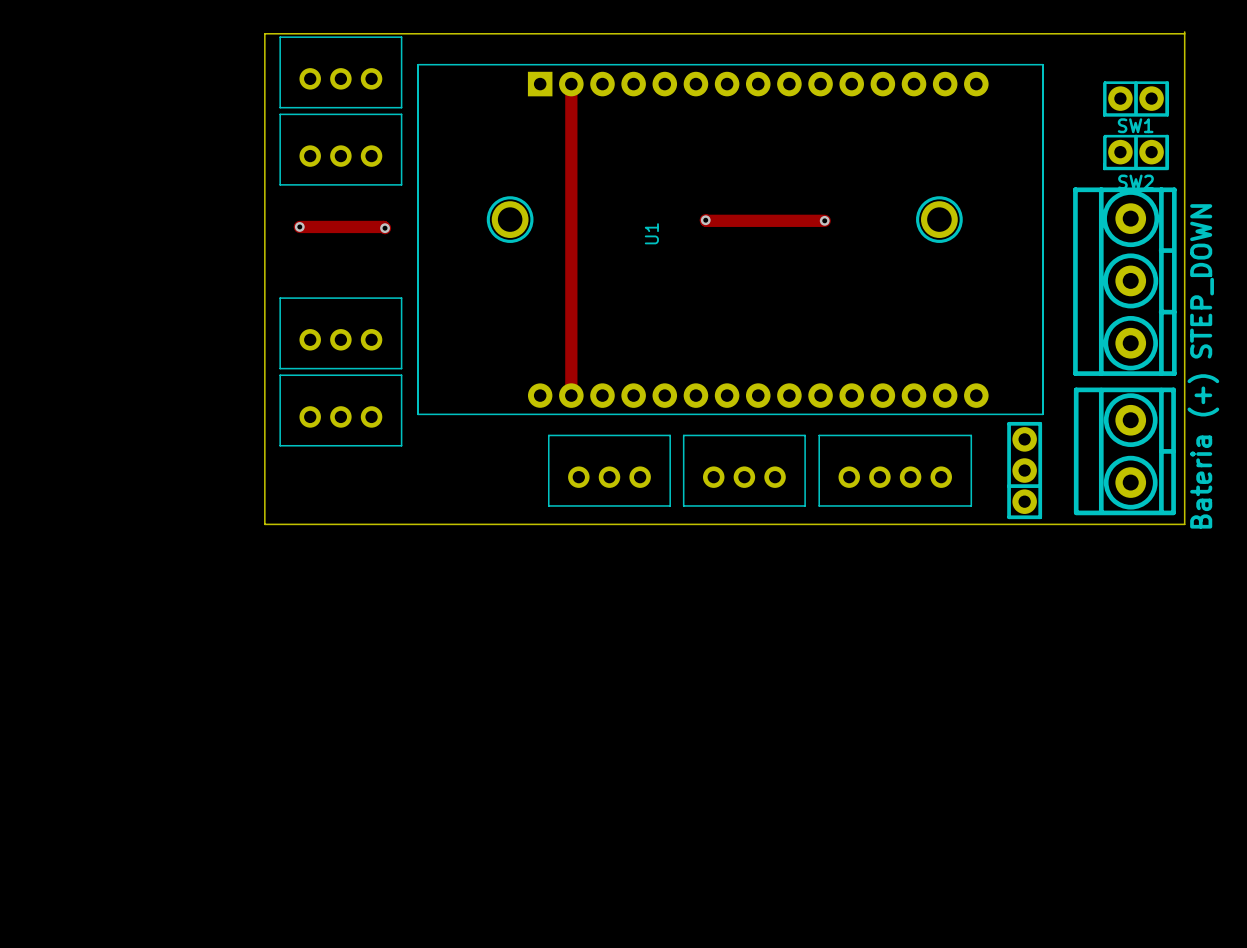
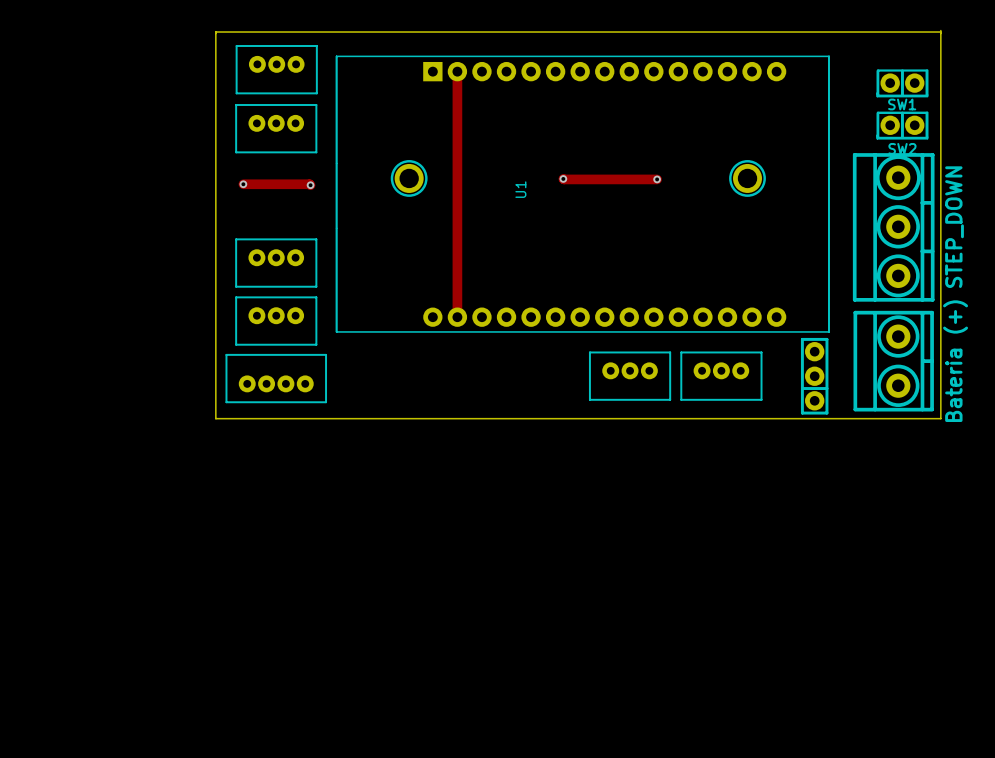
part footprint: [279, 36, 403, 109] -> [235, 45, 318, 95]
part footprint: [279, 113, 403, 186] -> [235, 104, 318, 154]
part footprint: [279, 297, 403, 370] -> [235, 238, 318, 288]
part footprint: [279, 374, 403, 447] -> [235, 296, 318, 346]
part footprint: [818, 434, 973, 507] -> [680, 351, 763, 401]
part: (609, 470) -> none
part: (744, 470) -> none
part: none -> (630, 376)
part: none -> (276, 378)

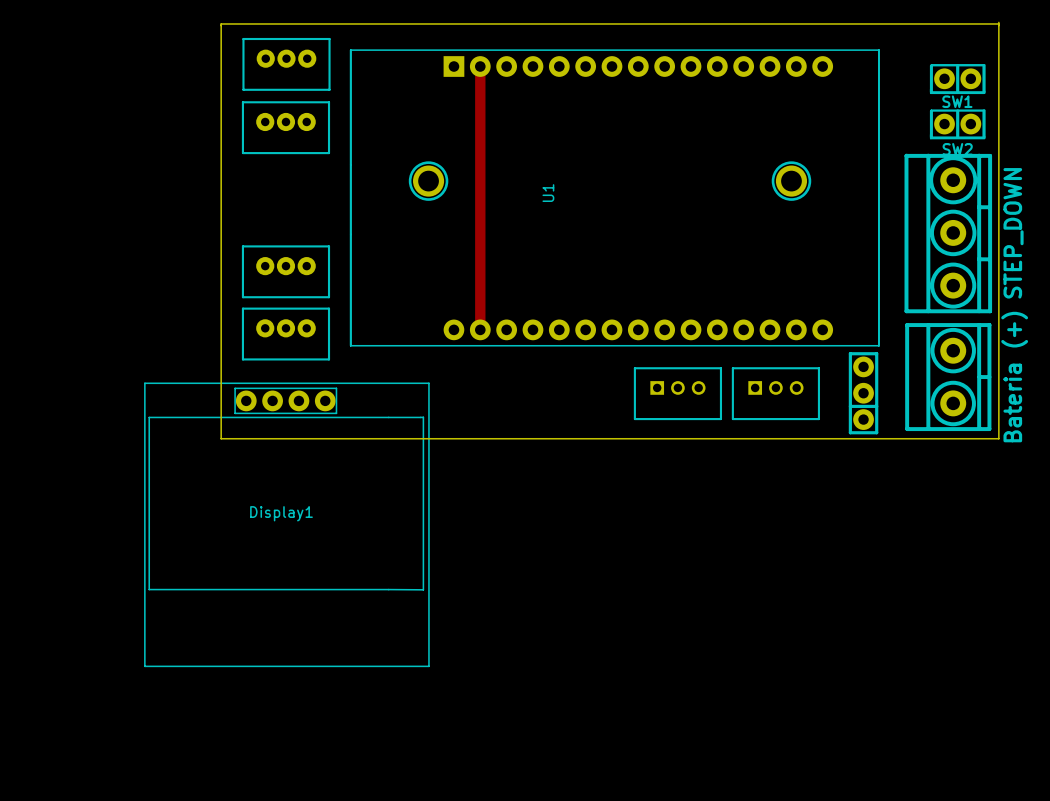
track: (563, 178) (657, 179) -> none
via: (563, 178) -> none
via: (657, 179) -> none
track: (243, 184) (310, 185) -> none
via: (243, 184) -> none
via: (310, 185) -> none
part: (630, 376) -> none
part: none -> (677, 393)
part: (721, 376) -> none
part: none -> (775, 393)
part: (276, 378) -> none
Display1: none -> (286, 524)

